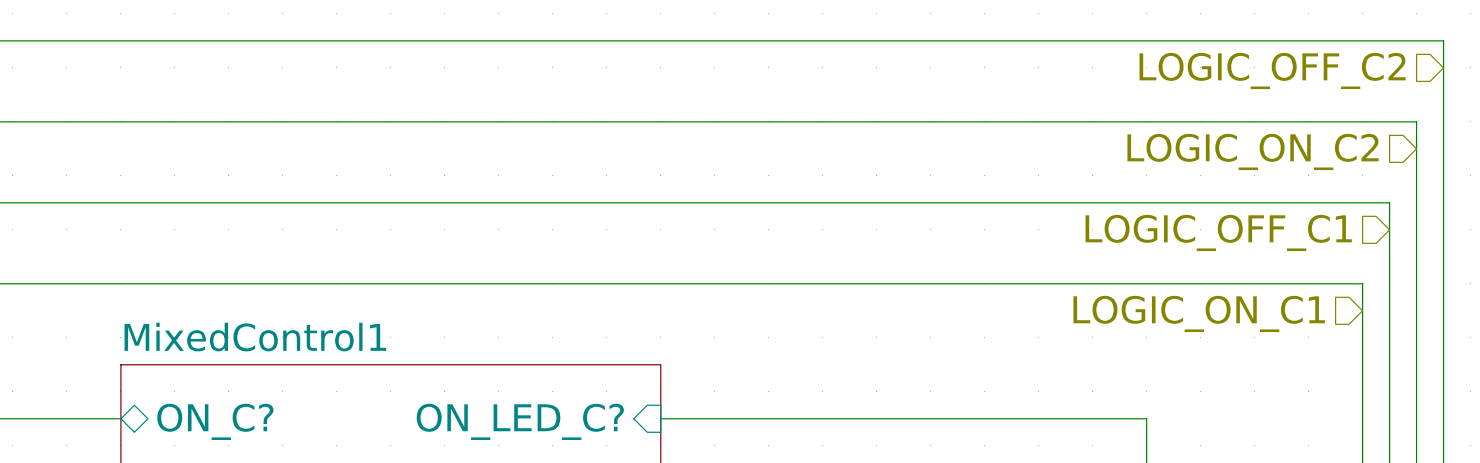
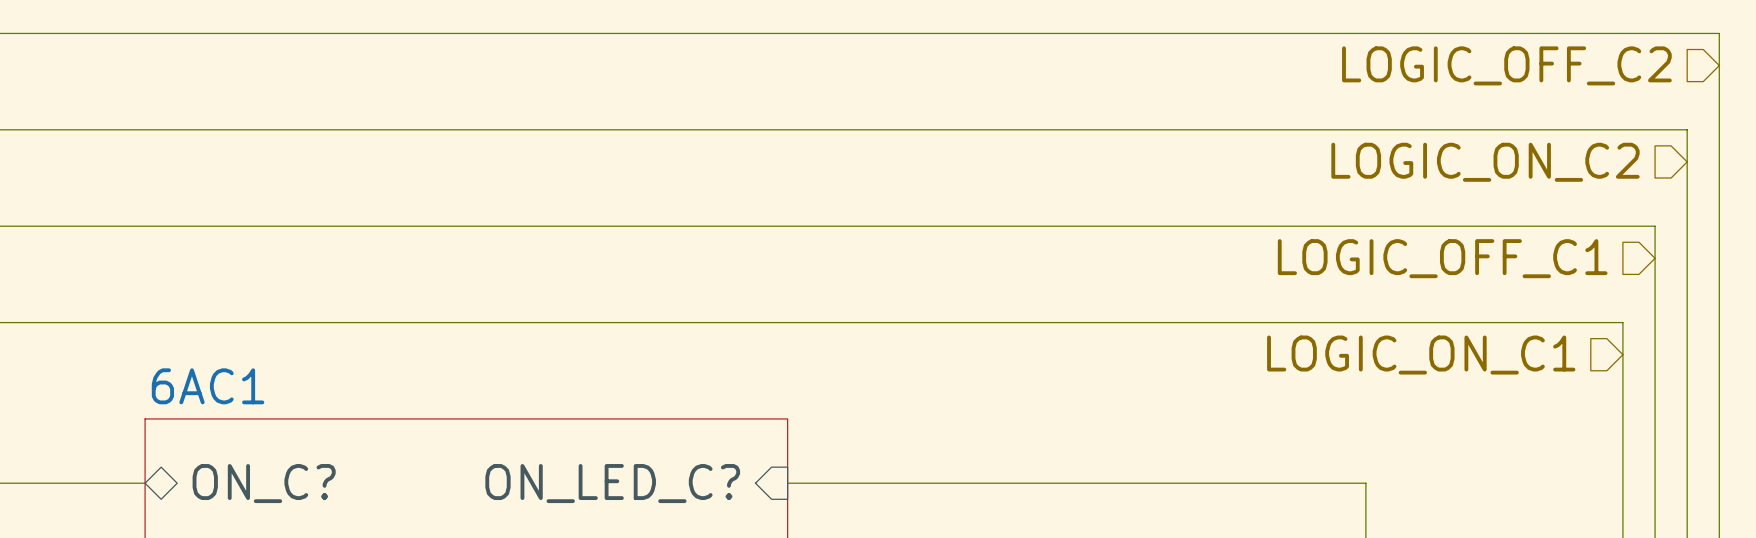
sheet MixedControl1 name: MixedControl1 (255, 337) -> 6AC1 (208, 386)

